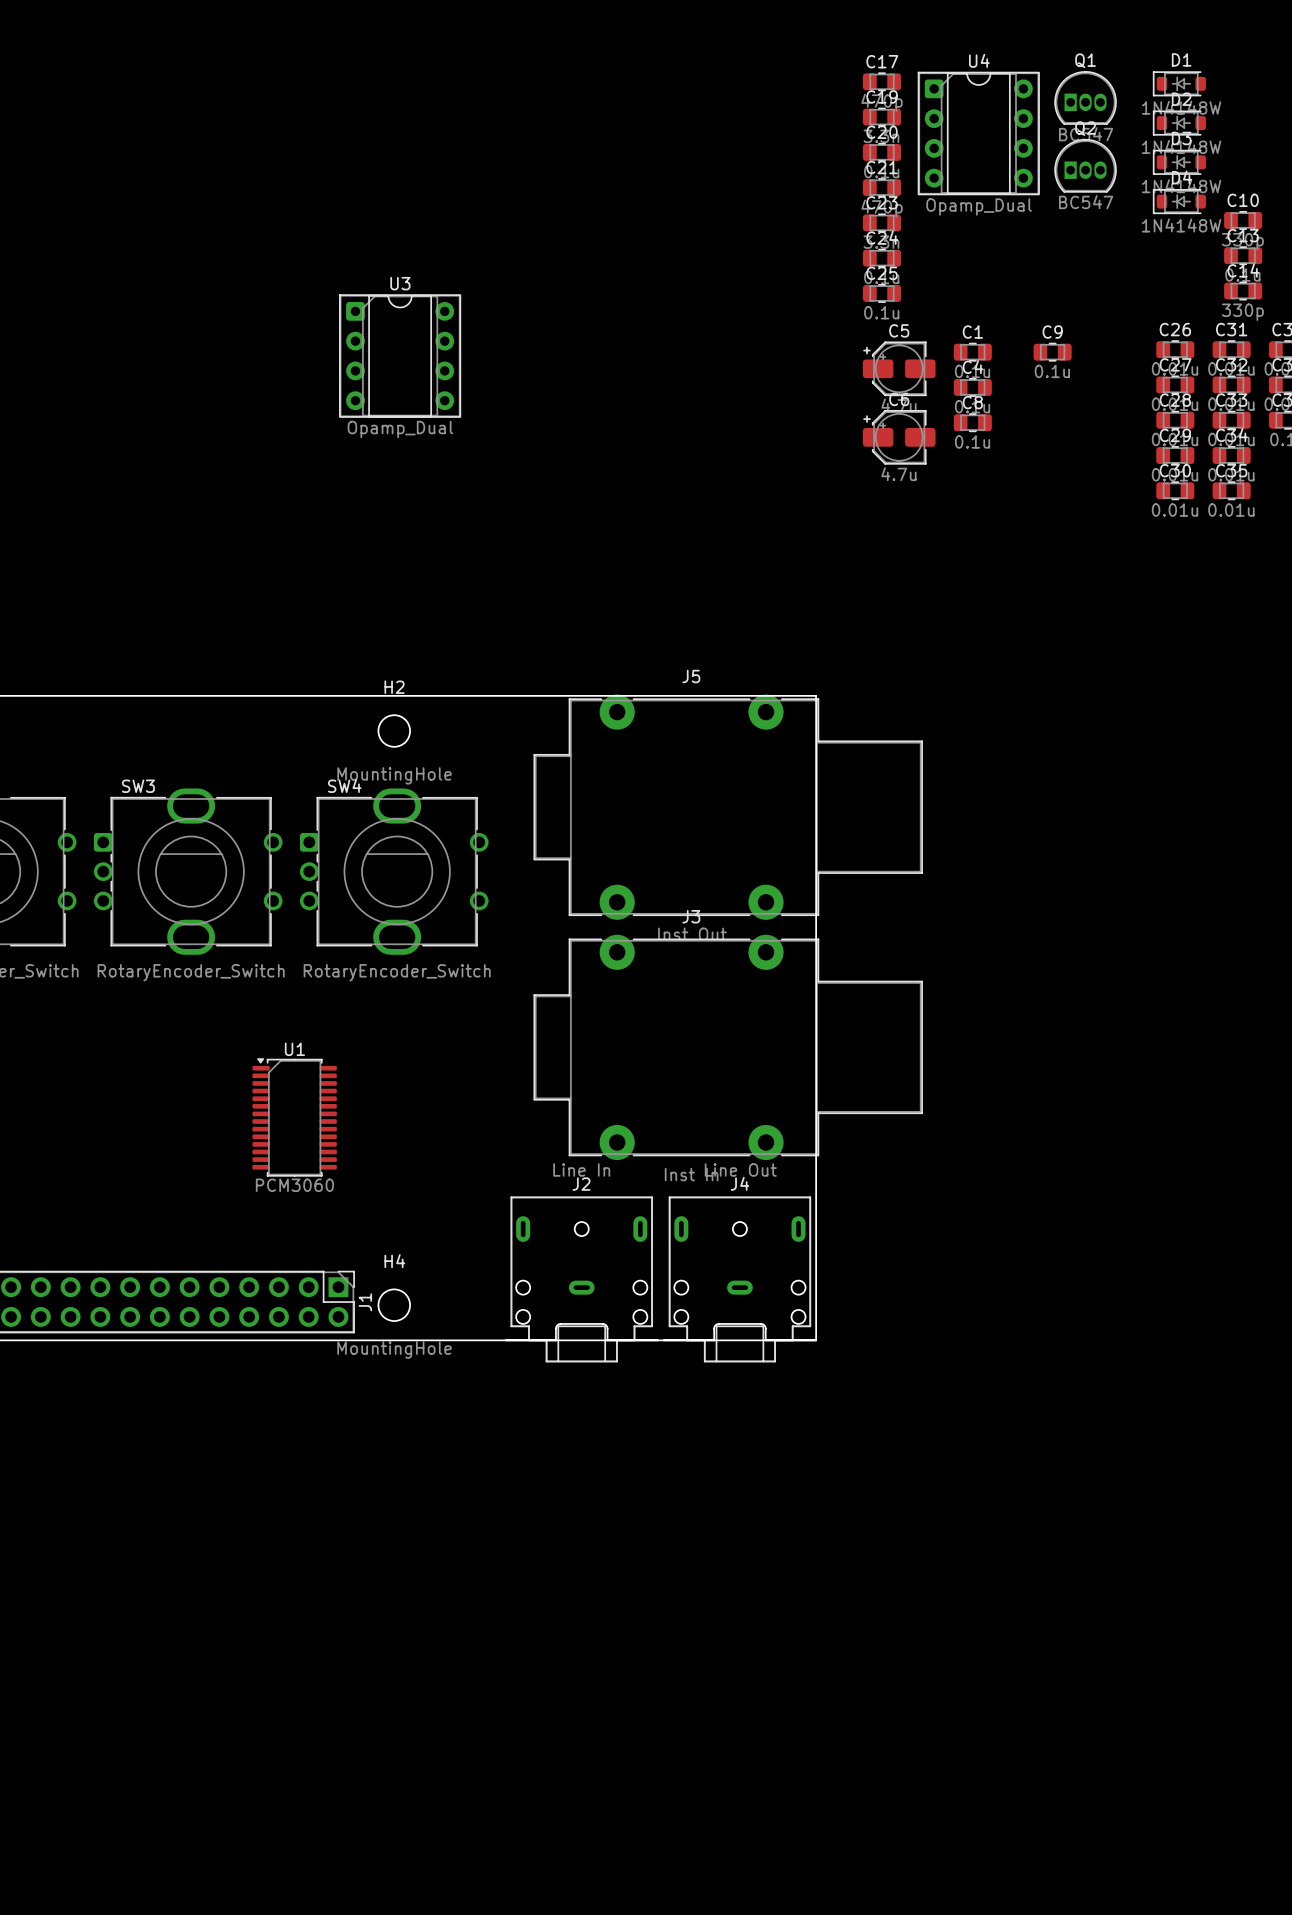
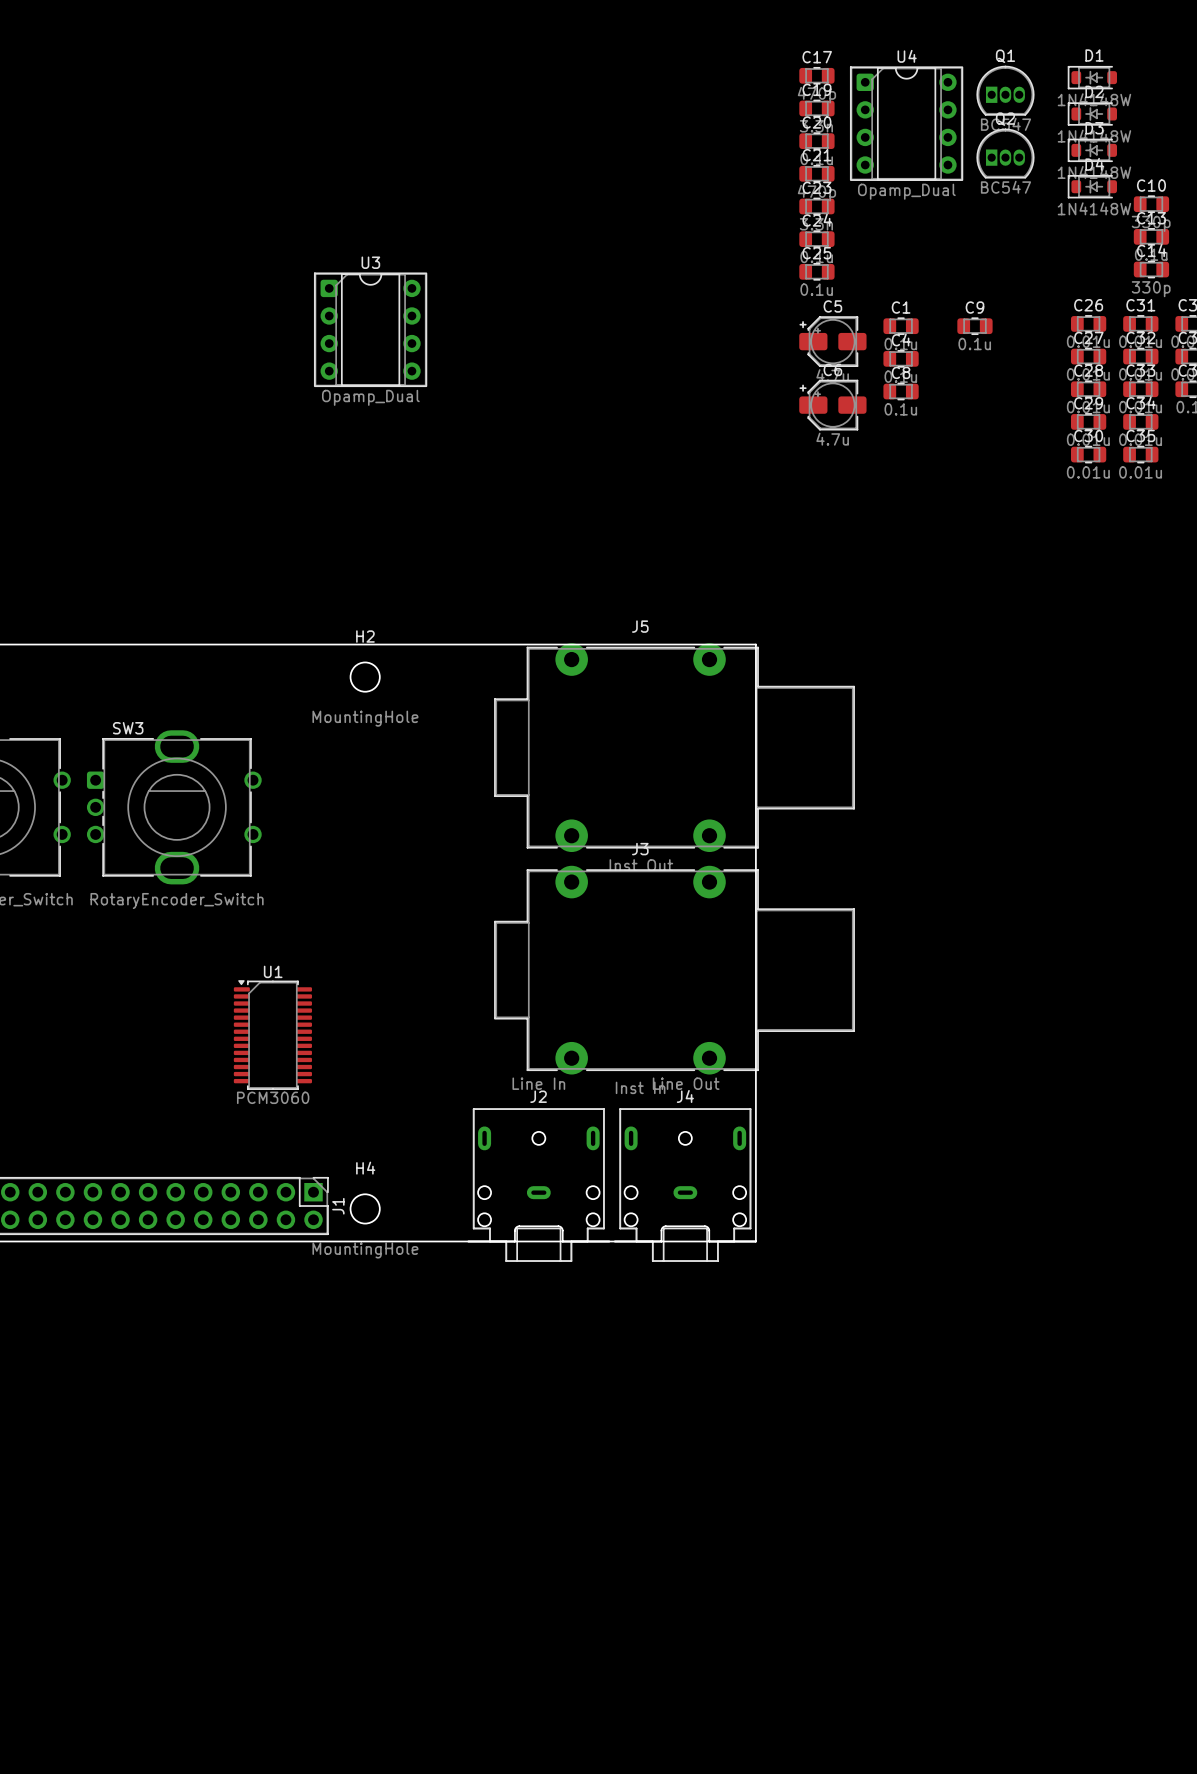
SW4: RotaryEncoder_Switch (394, 871) -> none

